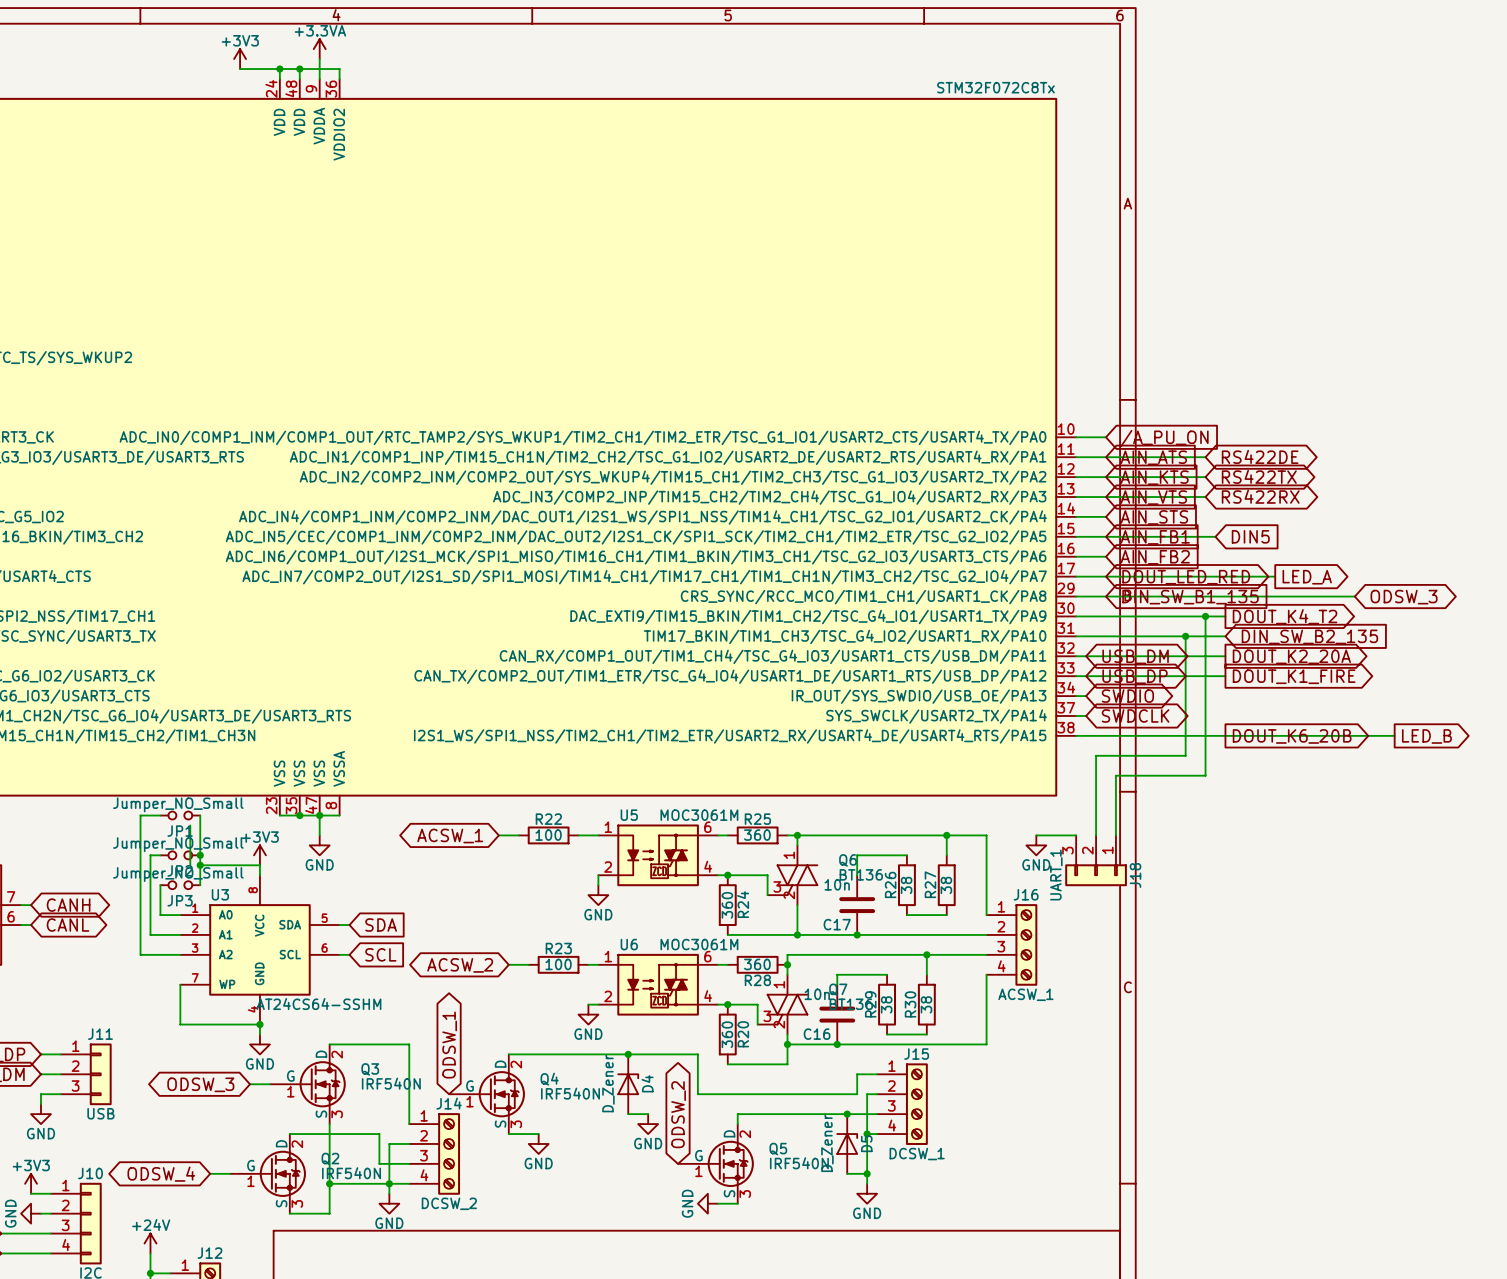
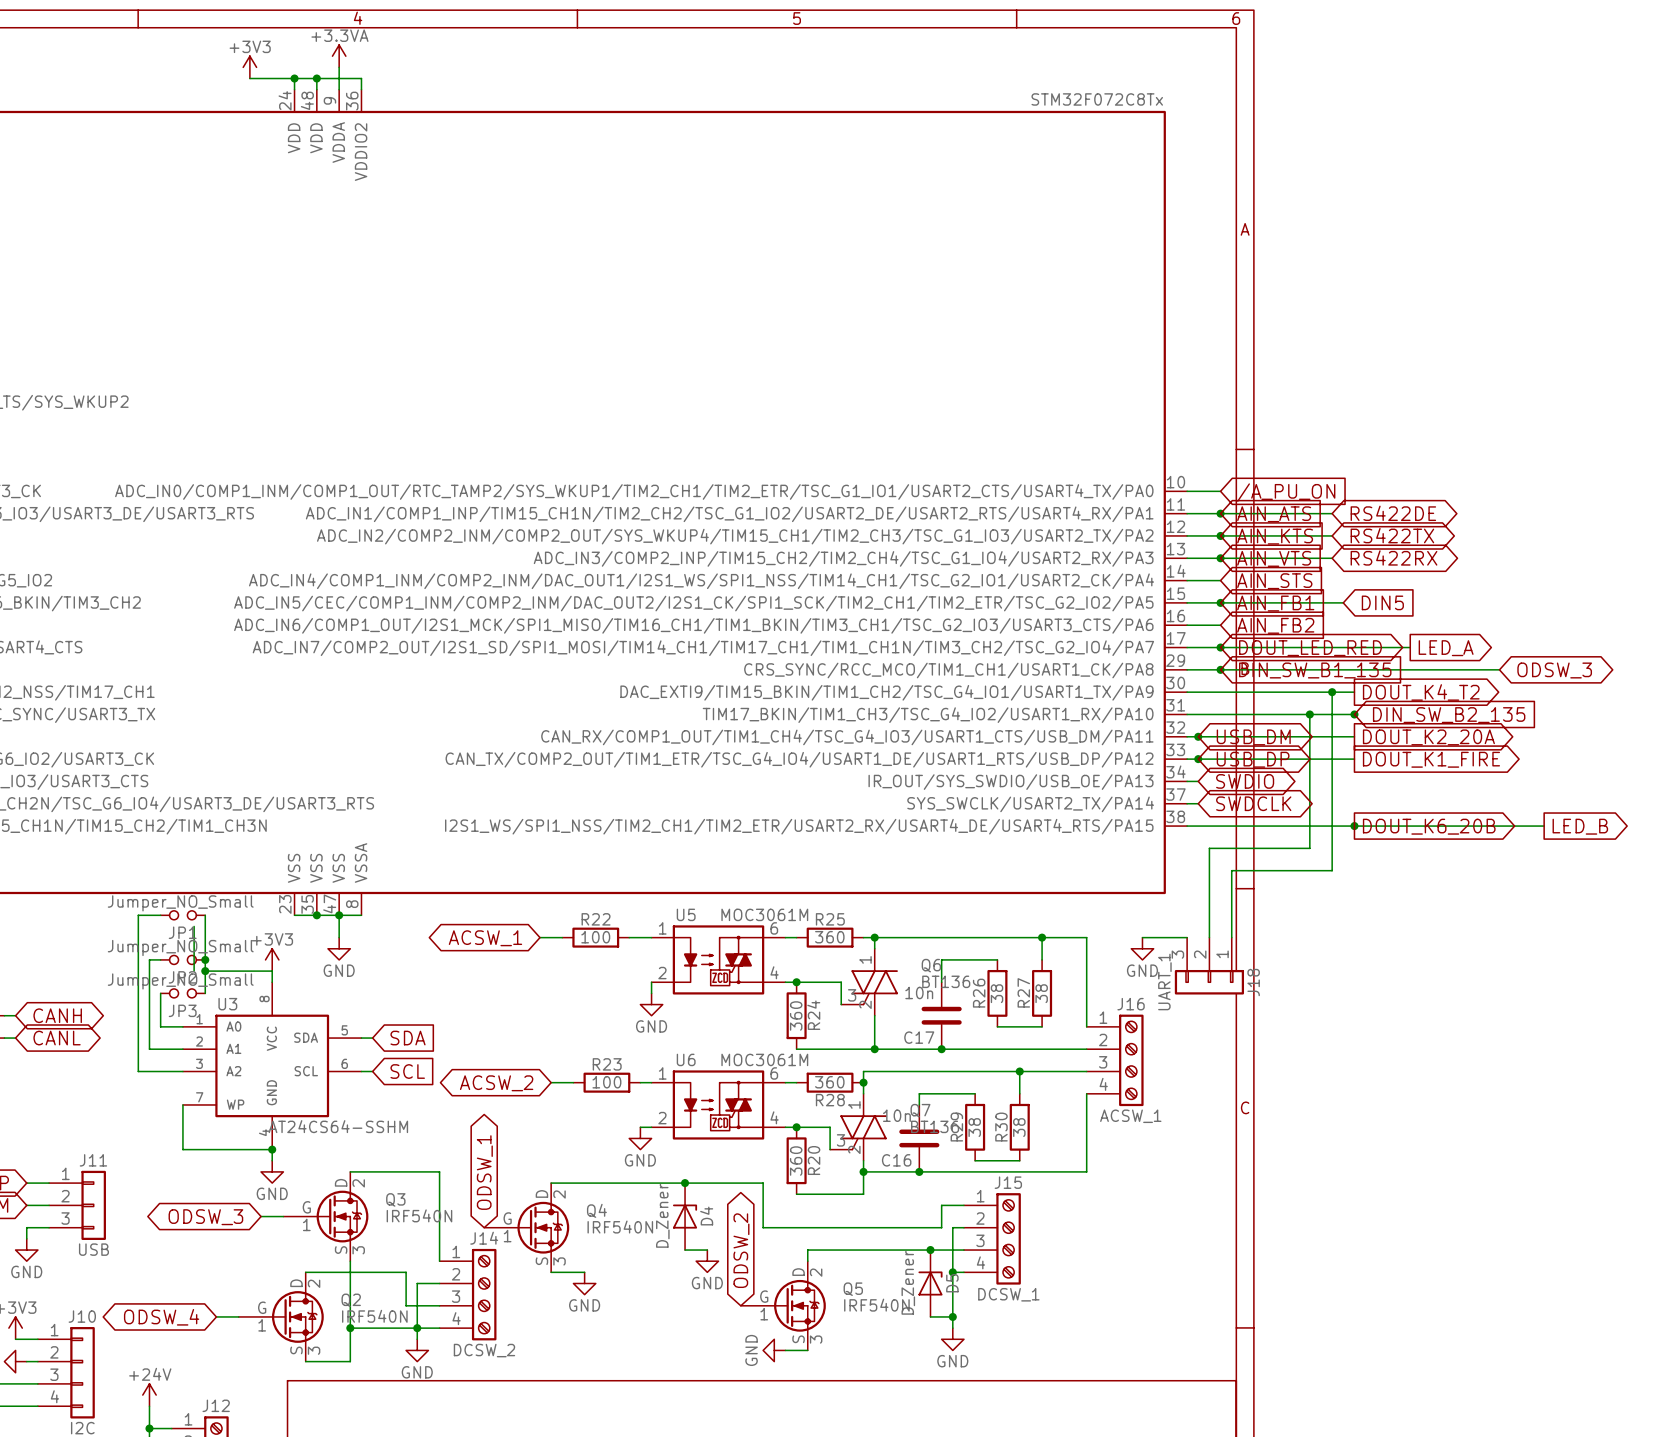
junction: none -> (1220, 513)
junction: none -> (1220, 535)
junction: none -> (1220, 558)
junction: none -> (1220, 602)
junction: none -> (1220, 647)
junction: none -> (1220, 669)
junction: none -> (1354, 714)
junction: none -> (1198, 736)
junction: none -> (1198, 759)
junction: none -> (1354, 826)

